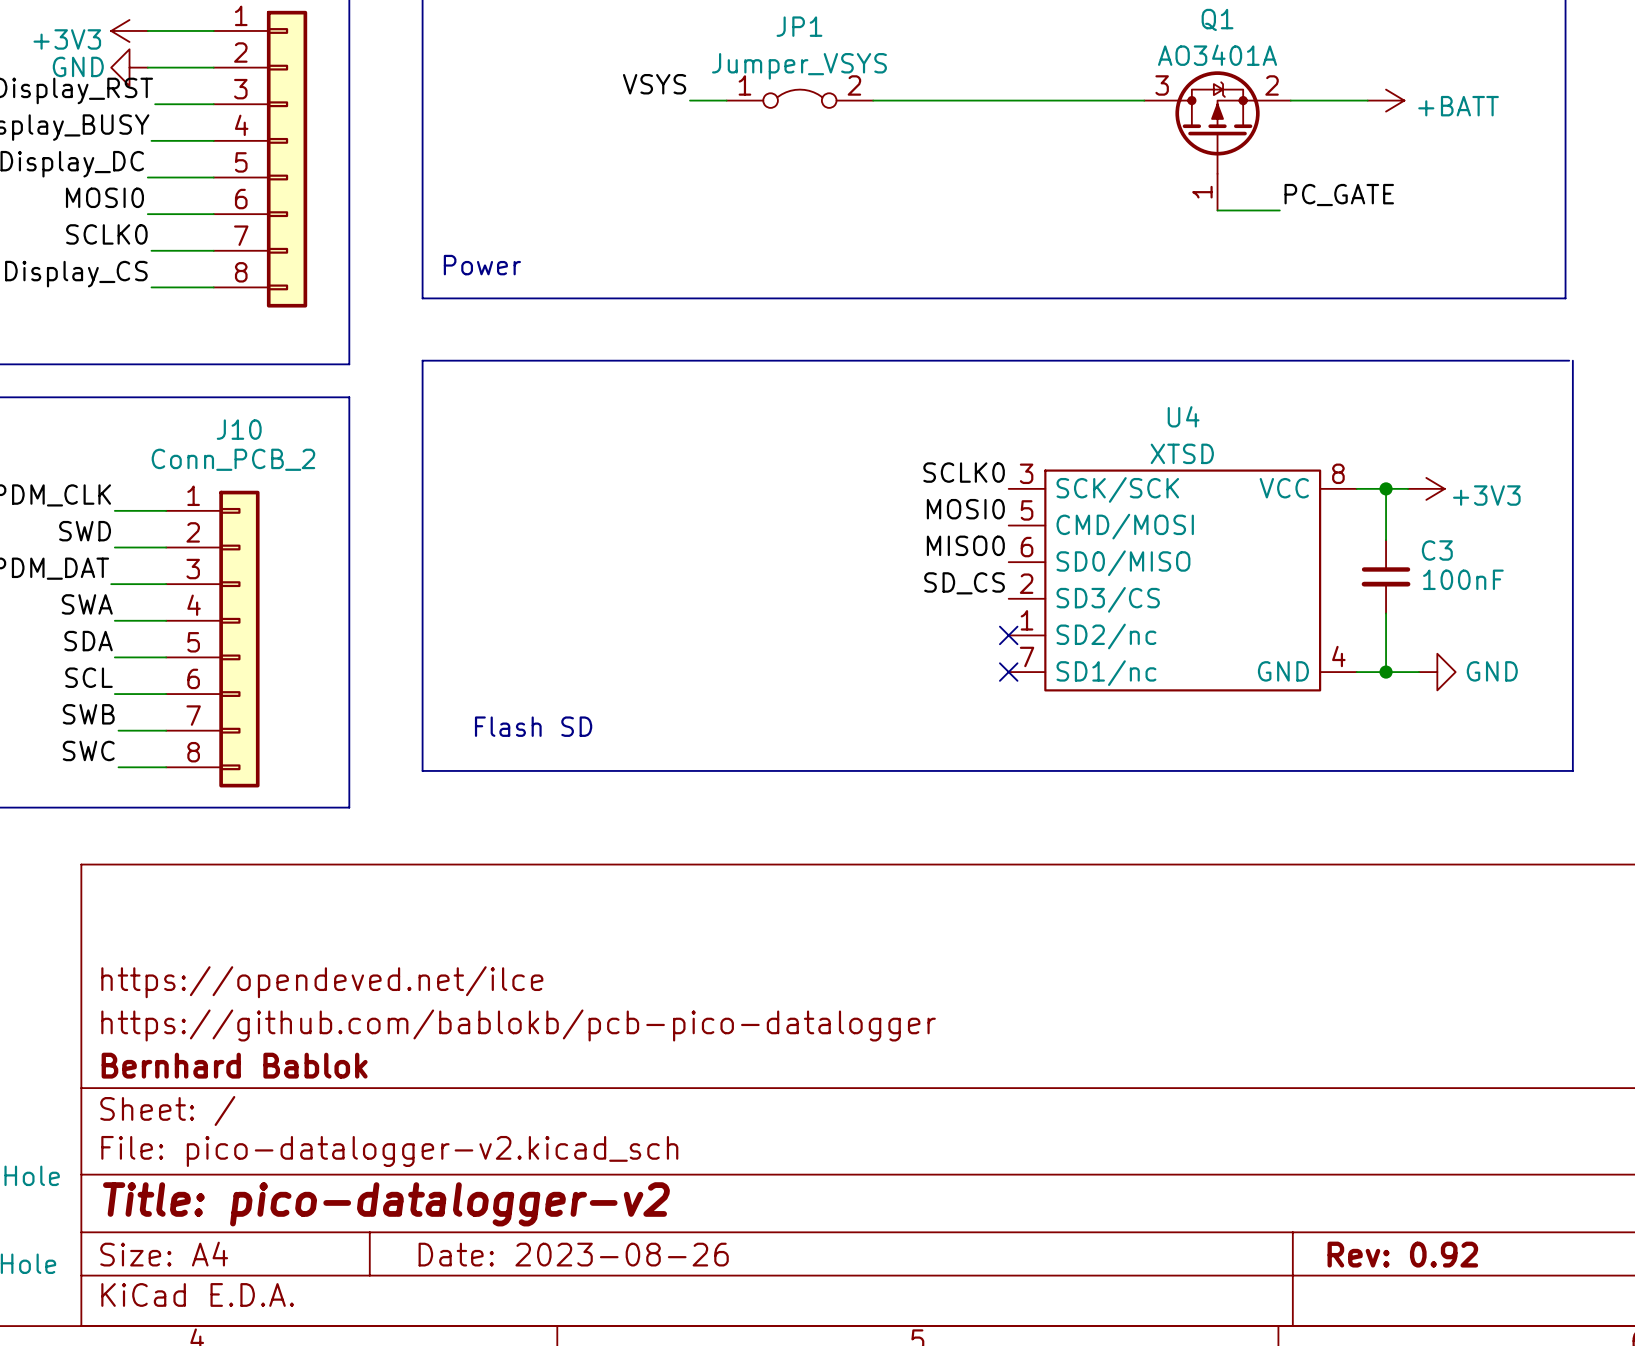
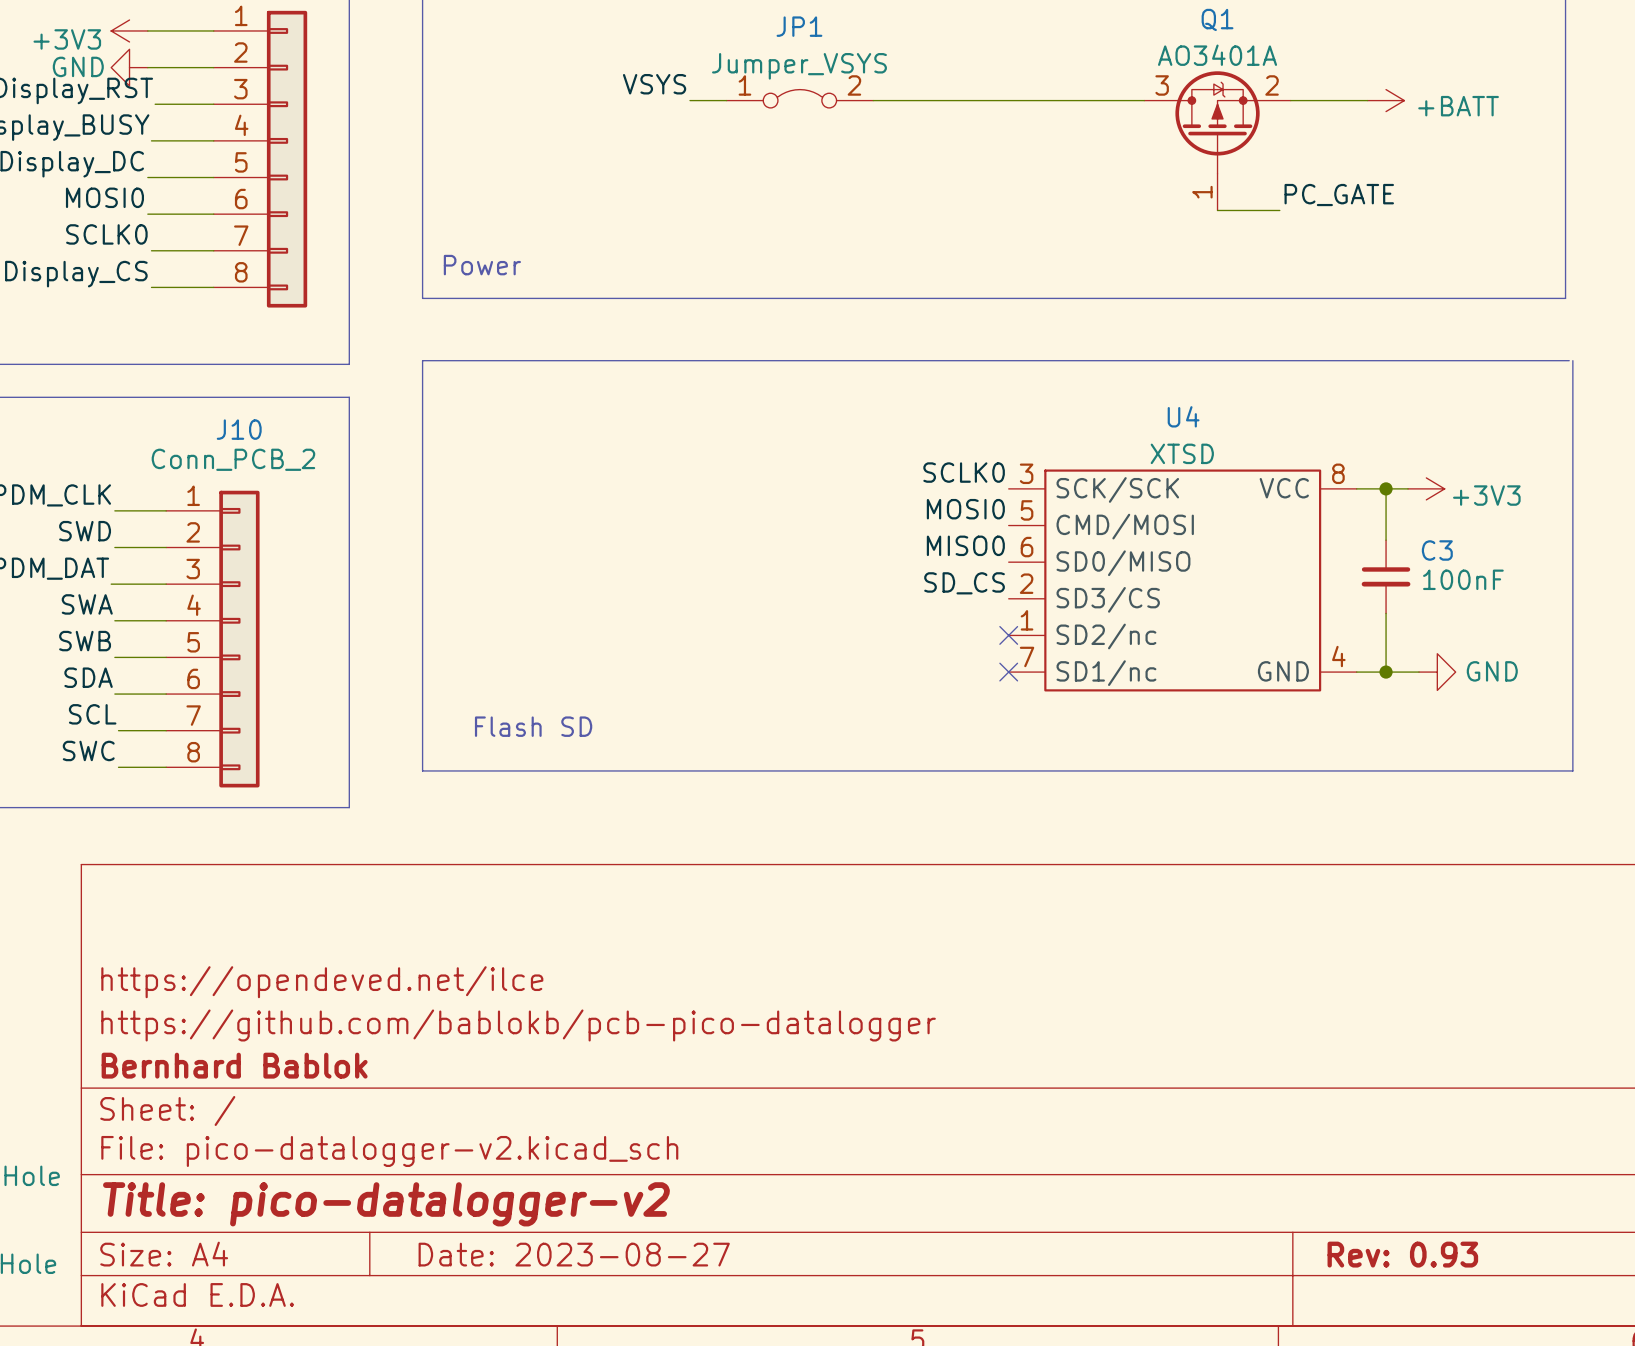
label: SDA (88, 641) -> SWB (85, 641)
label: SCL (89, 677) -> SDA (88, 677)
label: SWB (88, 714) -> SCL (92, 714)
title block: Date: 2023-08-26 (573, 1254) -> Date: 2023-08-27 (574, 1254)
title block: Rev: 0.92 (1402, 1254) -> Rev: 0.93 (1402, 1254)

